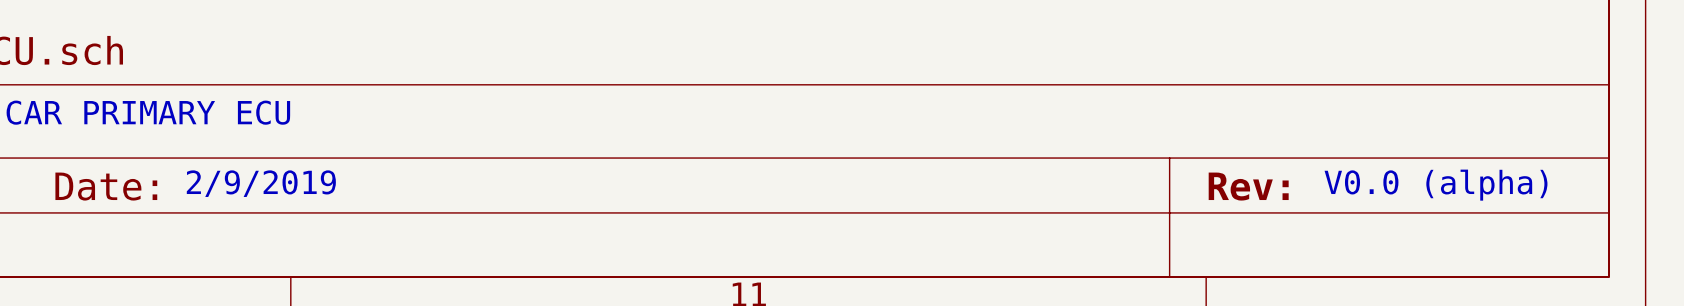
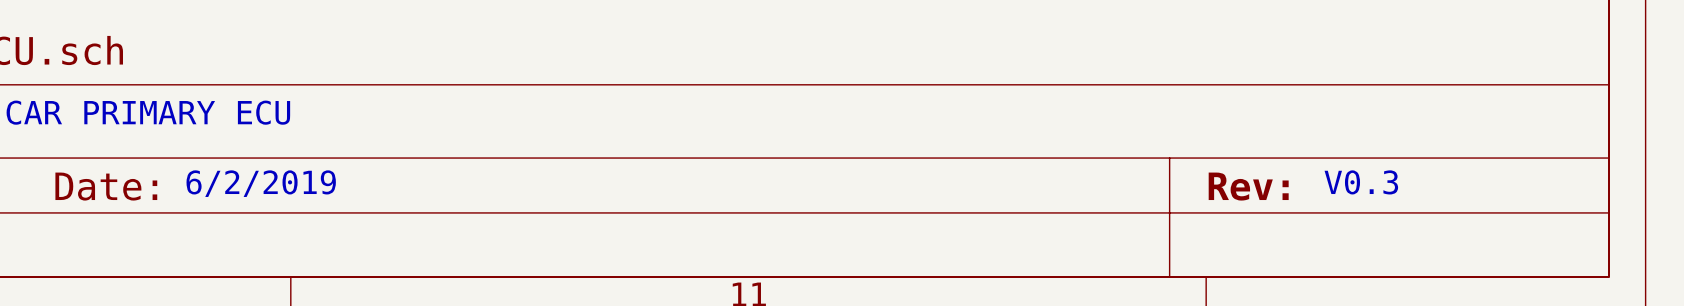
text: 2/9/2019 (261, 183) -> 6/2/2019 (261, 183)
text: V0.0 (alpha) (1436, 185) -> V0.3 (1361, 182)

